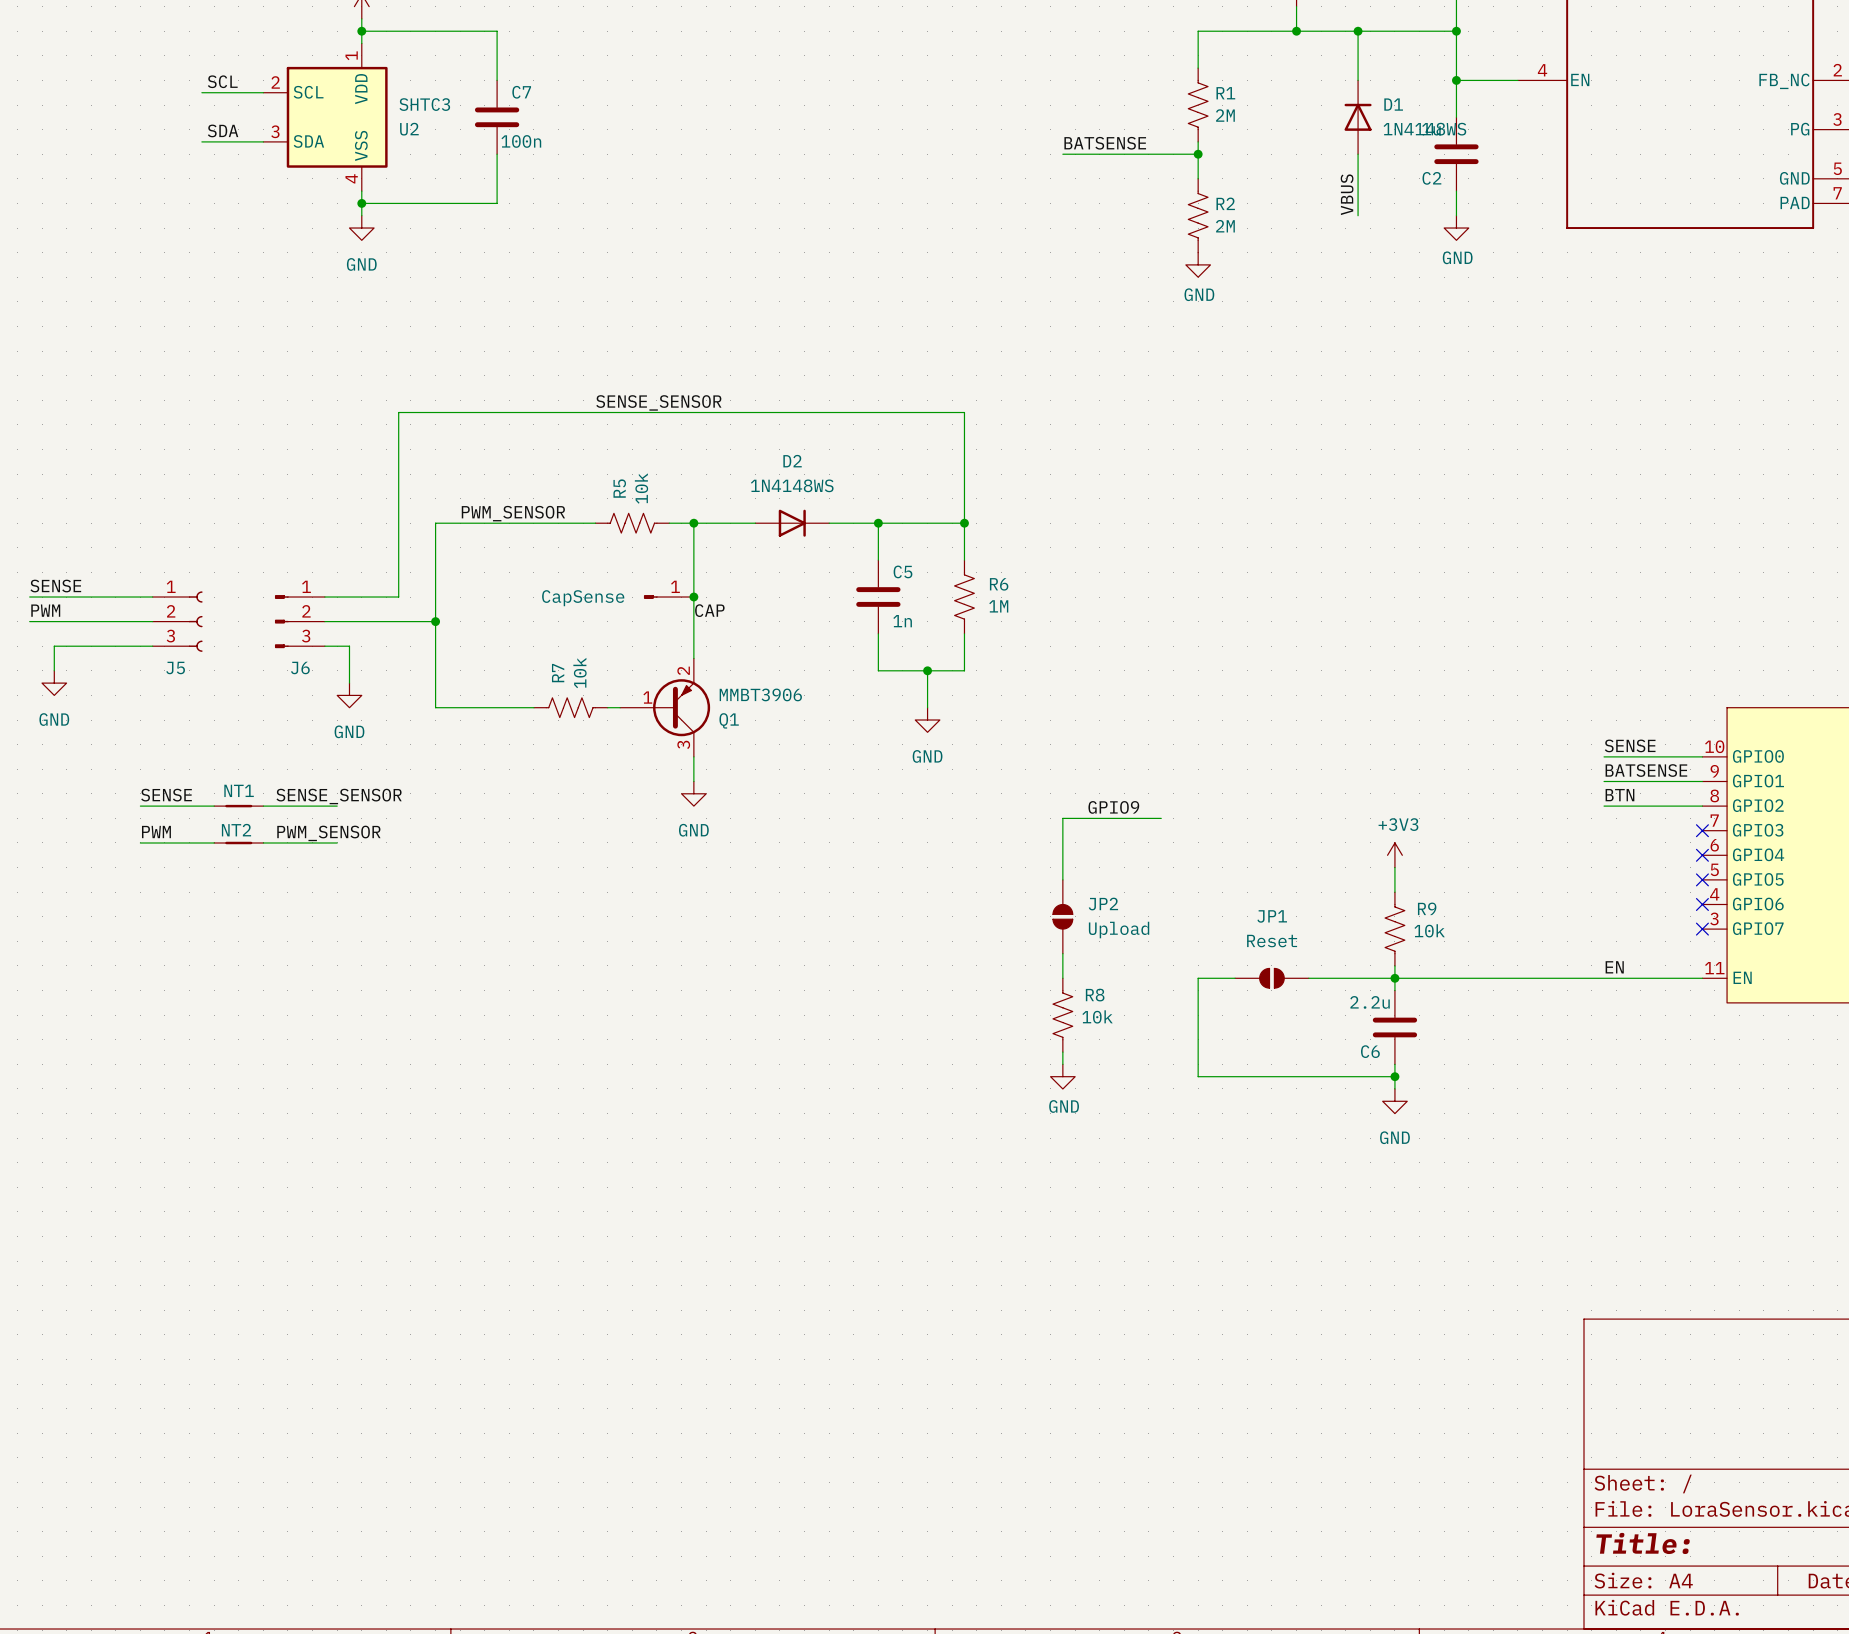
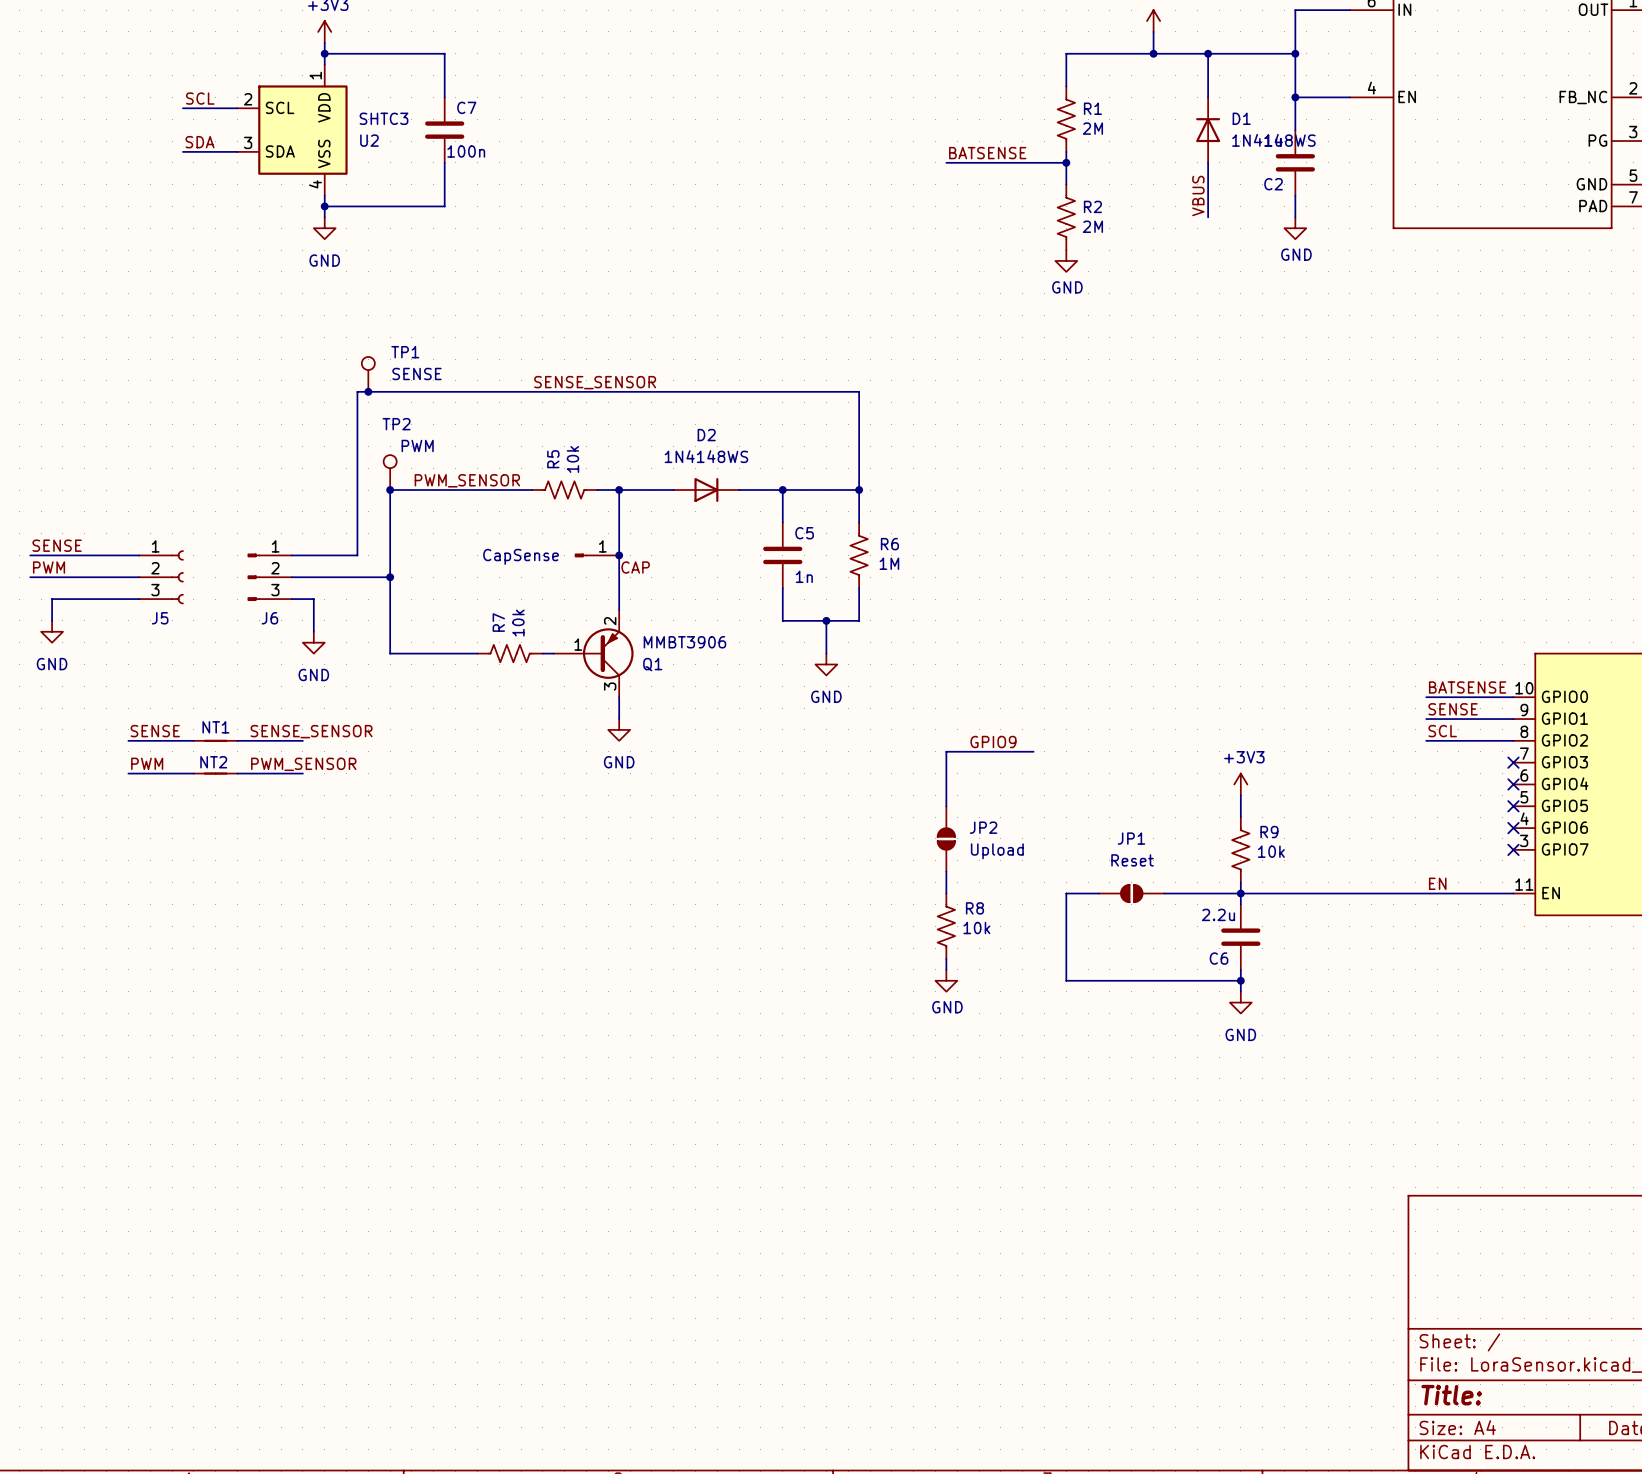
TP1: none -> SENSE (368, 374)
junction: none -> (368, 391)
TP2: none -> PWM (390, 472)
junction: none -> (390, 490)
label: SENSE (1630, 745) -> BATSENSE (1467, 687)
label: BATSENSE (1646, 770) -> SENSE (1453, 709)
label: BTN (1619, 795) -> SCL (1442, 731)

